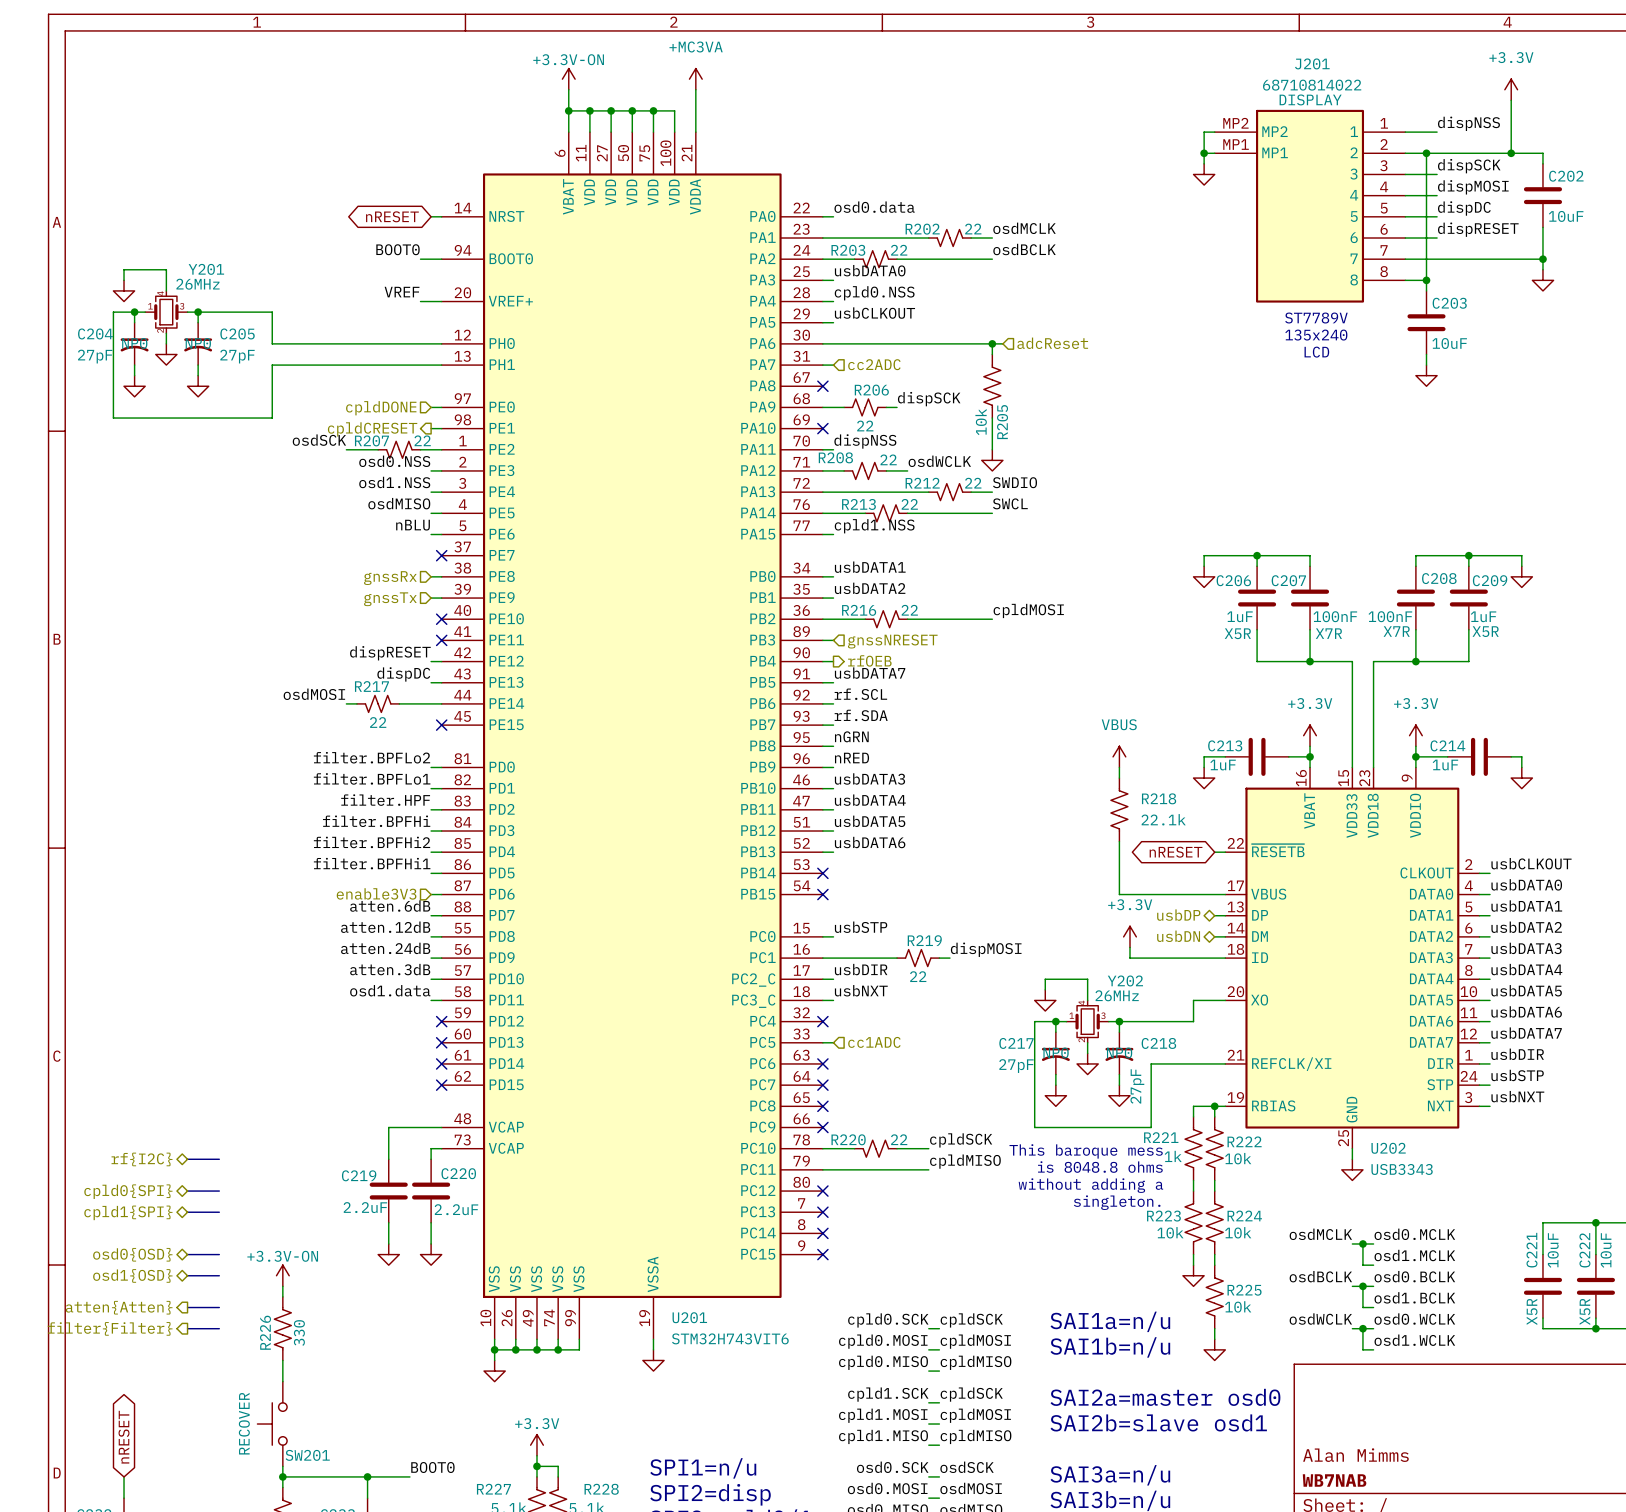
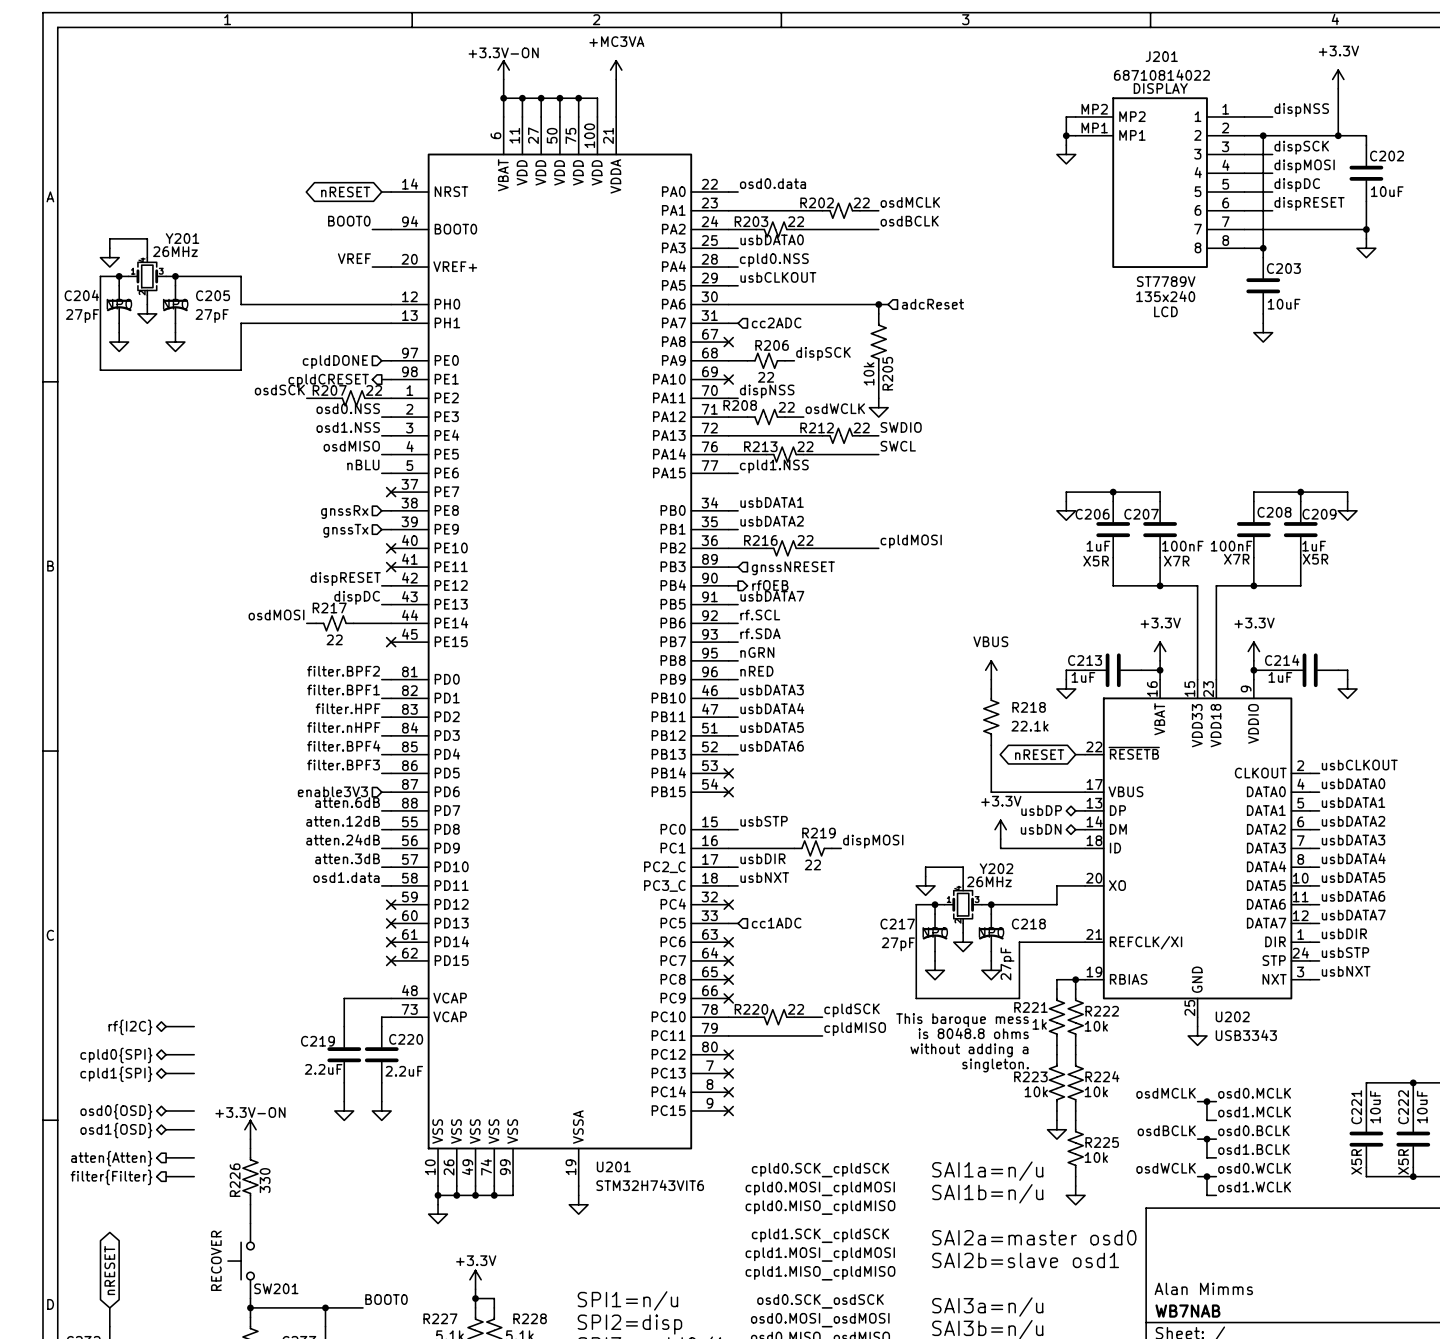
label: filter.BPFLo2 (372, 757) -> filter.BPF2 (343, 671)
label: filter.BPFLo1 (372, 778) -> filter.BPF1 (343, 690)
label: filter.BPFHi (376, 821) -> filter.nHPF (343, 727)
label: filter.BPFHi2 (372, 842) -> filter.BPF4 (343, 746)
label: filter.BPFHi1 (372, 863) -> filter.BPF3 (343, 765)

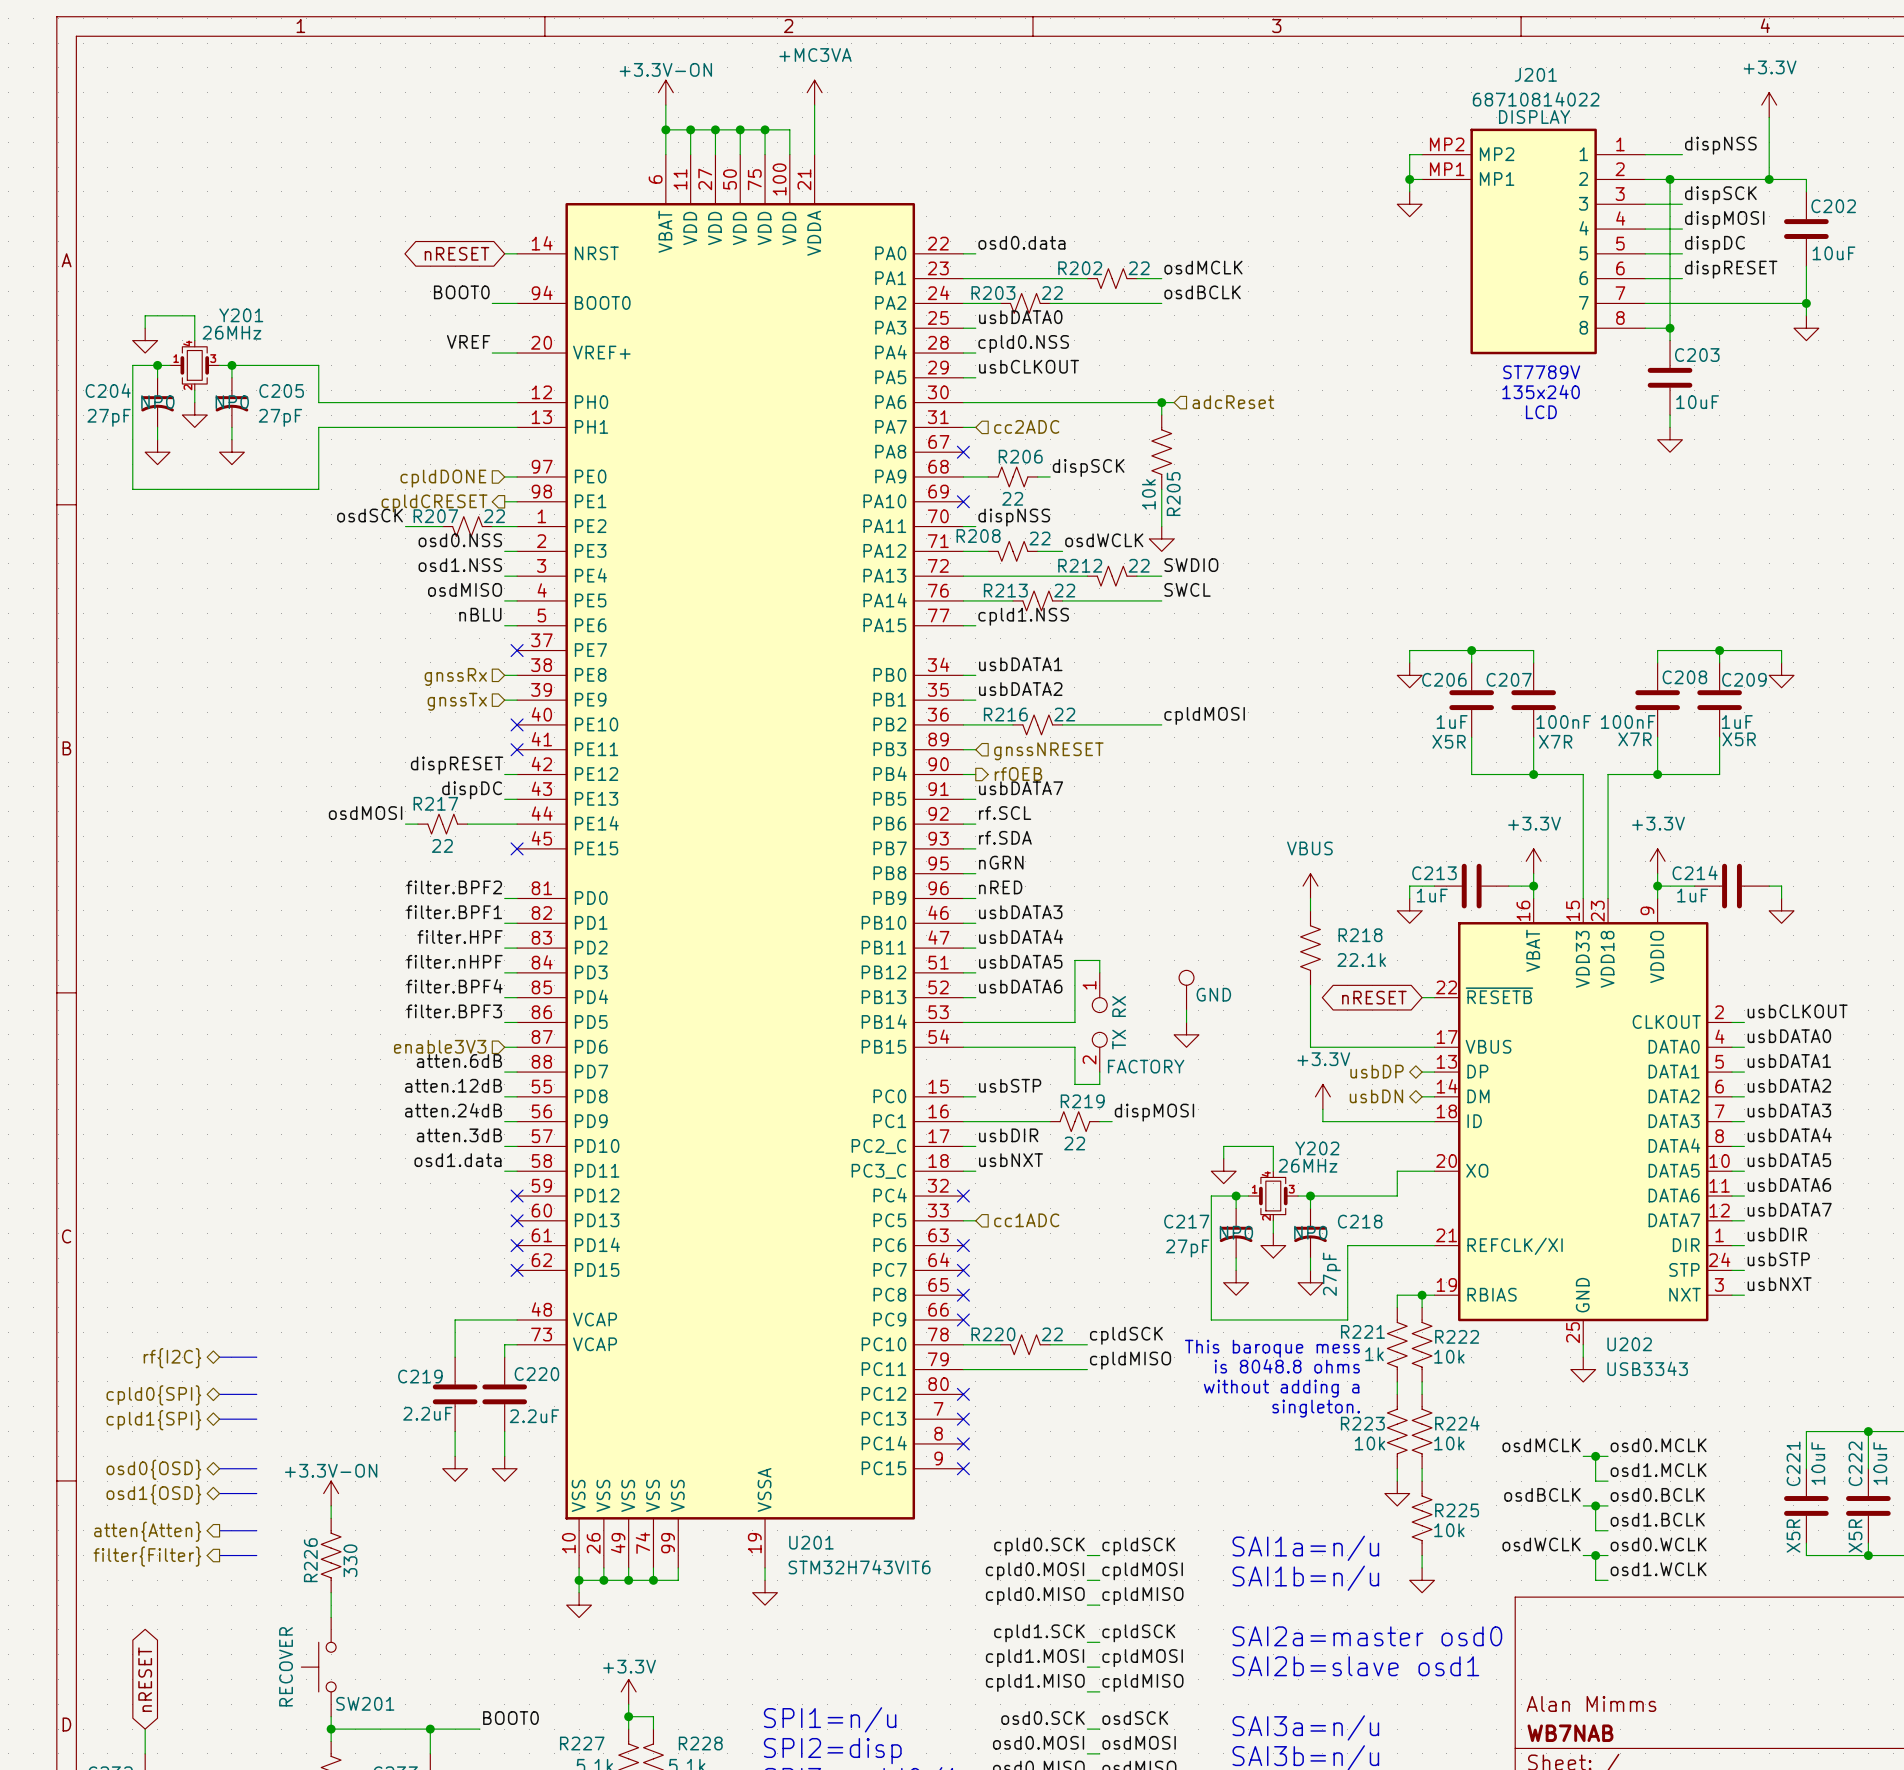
wire: none -> (1099, 972) (1099, 960) (1074, 960) (1074, 1022) (963, 1022)
part: none -> GND (1186, 990)
wire: none -> (1186, 1010) (1186, 1022)
no-connect mark: (728, 773) -> none
part: none -> FACTORY (1099, 1022)
power symbol: none -> (1186, 1034)
wire: none -> (963, 1047) (1074, 1047) (1074, 1084) (1099, 1084) (1099, 1072)
no-connect mark: (728, 792) -> none

